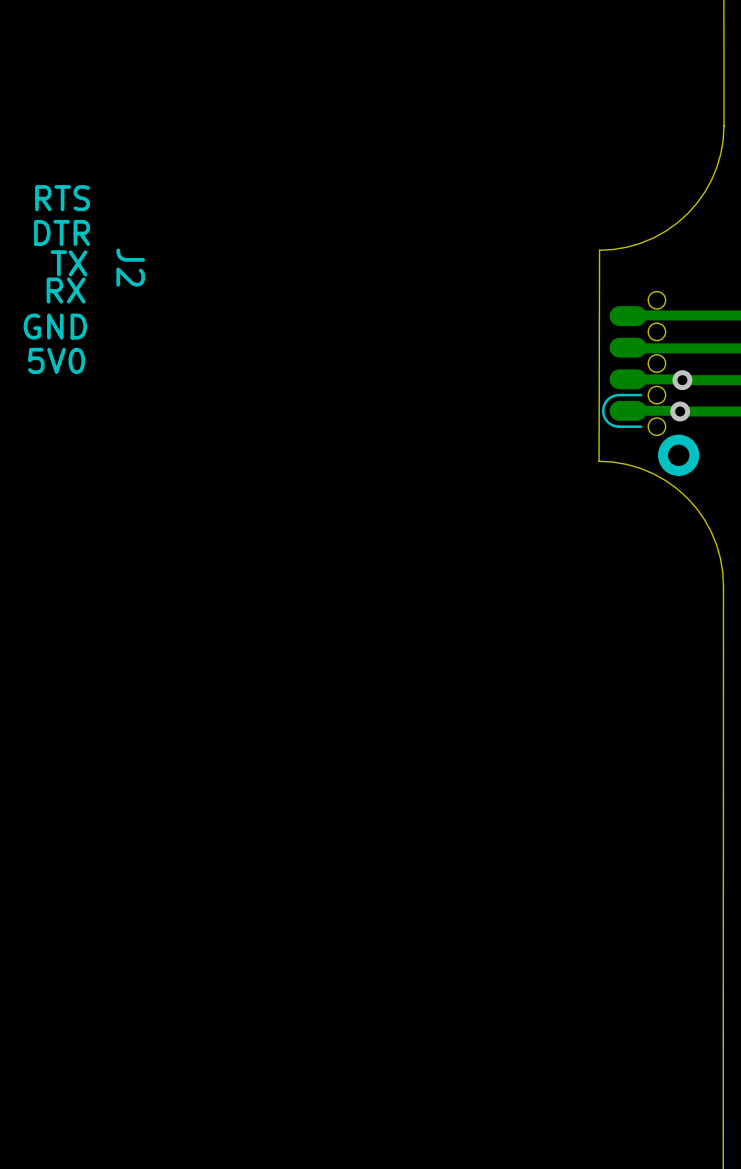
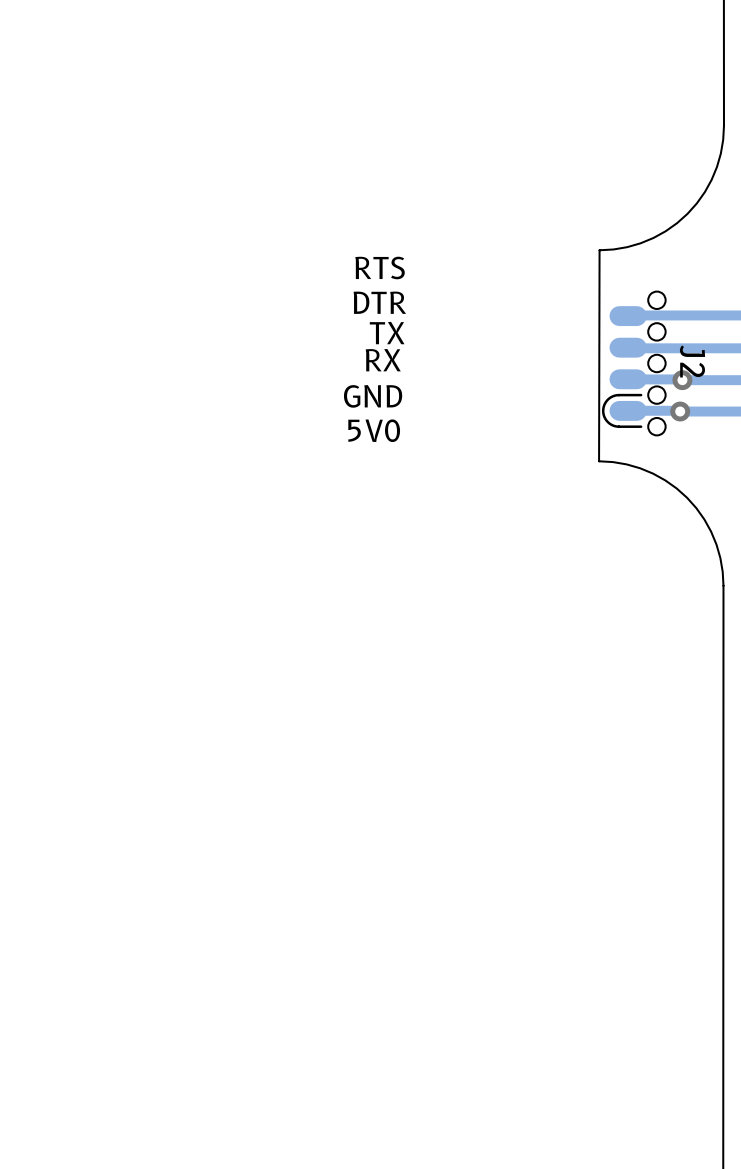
text position: RTS (62, 198) -> RTS (380, 267)
text position: DTR (62, 233) -> DTR (379, 302)
text position: TX (68, 263) -> TX (387, 333)
J2 name position: J2 (130, 267) -> J2 (692, 361)
text position: RX (66, 290) -> RX (383, 360)
text position: GND (55, 326) -> GND (373, 396)
text position: 5V0 (56, 360) -> 5V0 (374, 430)
drawing: [658, 434, 700, 476] -> none

